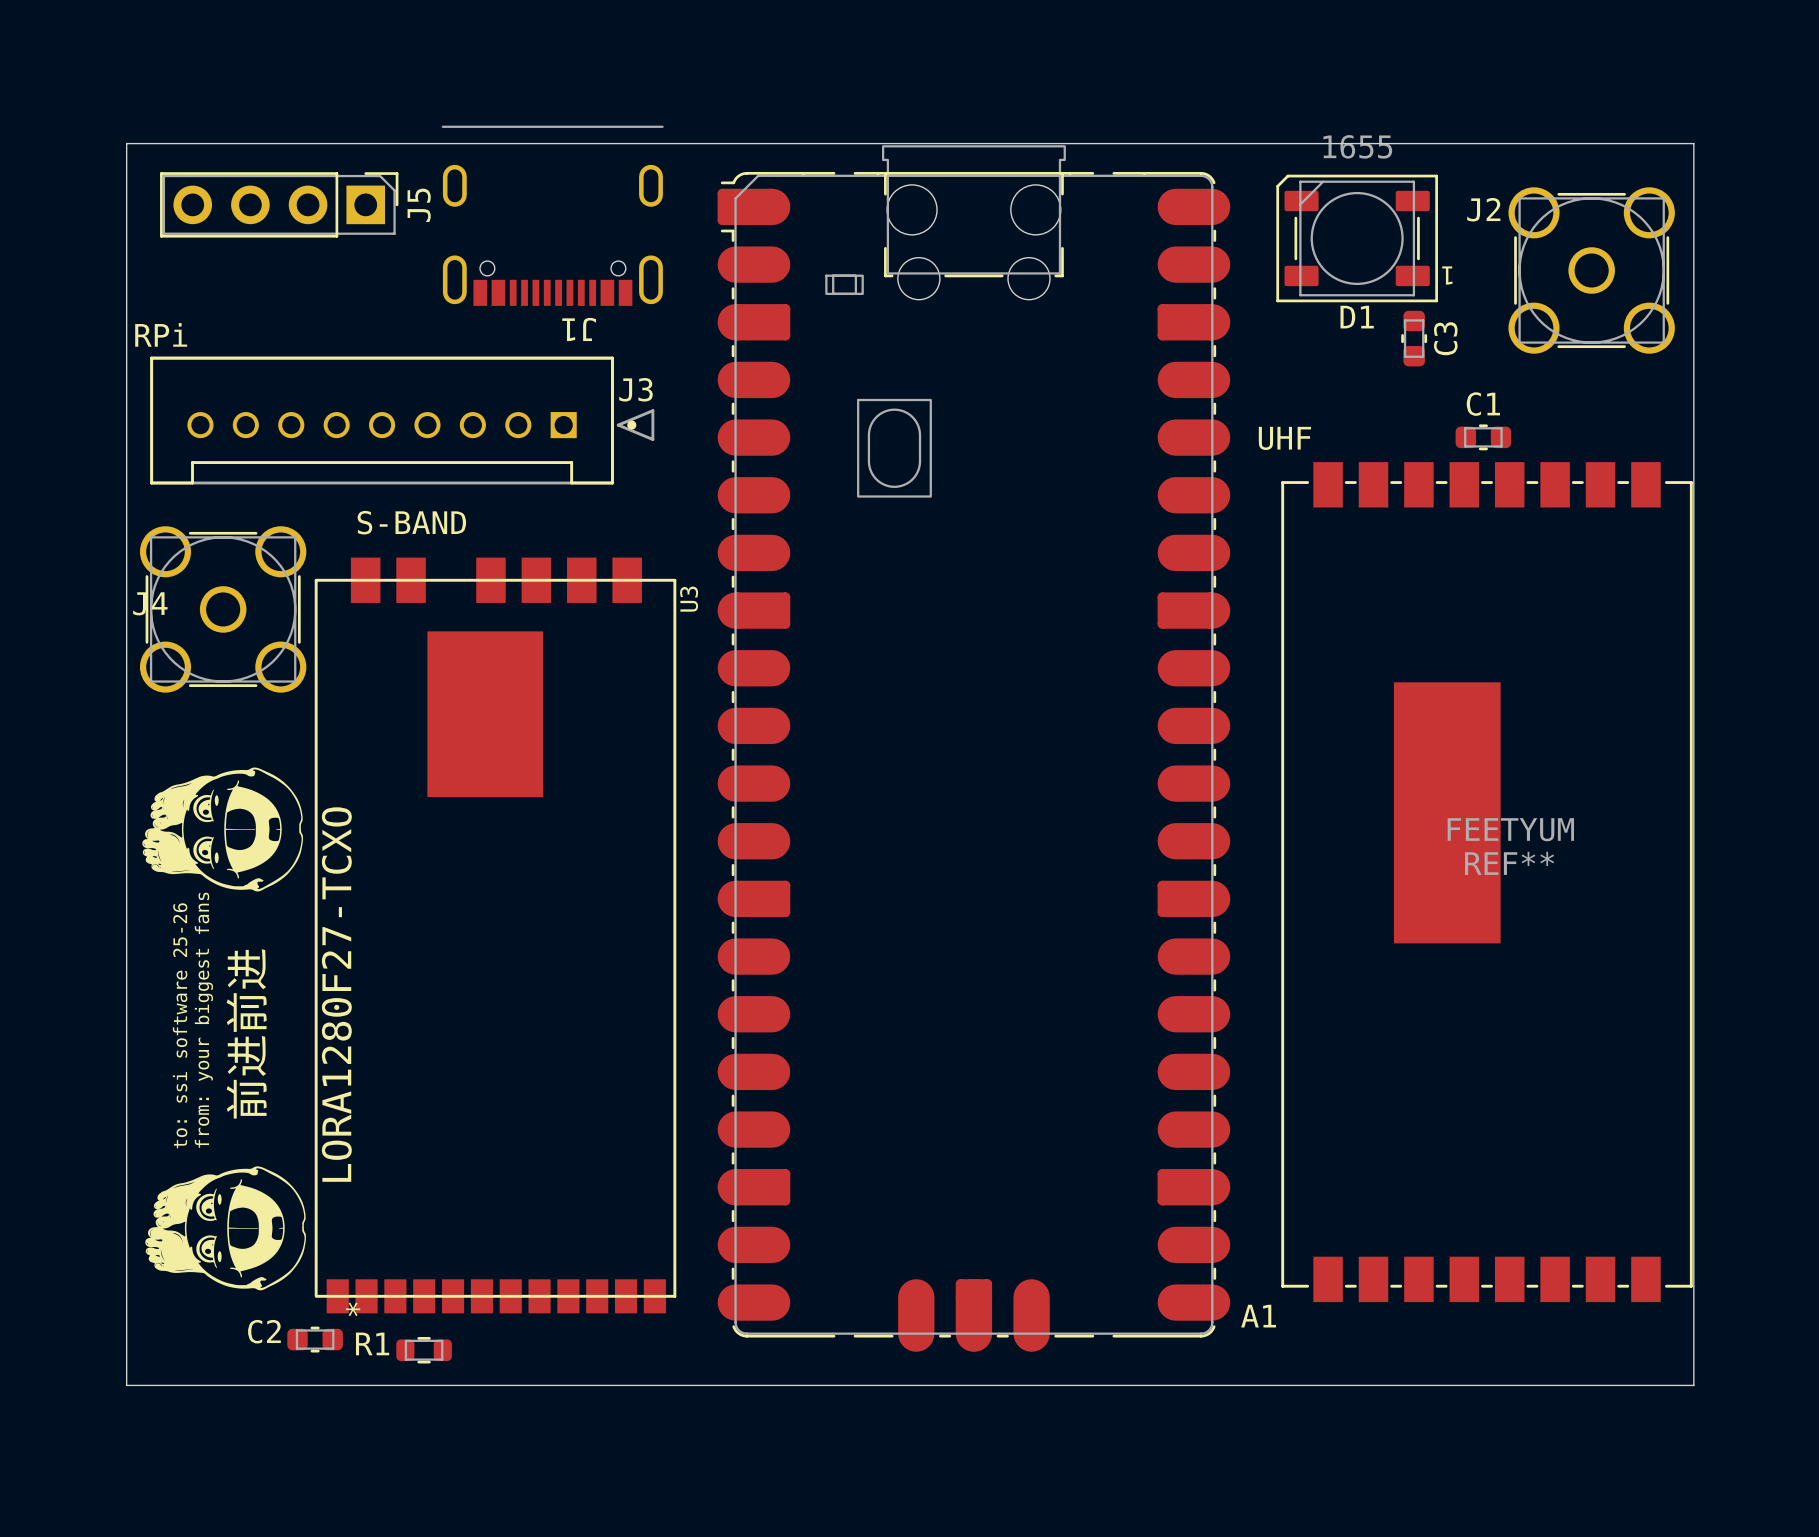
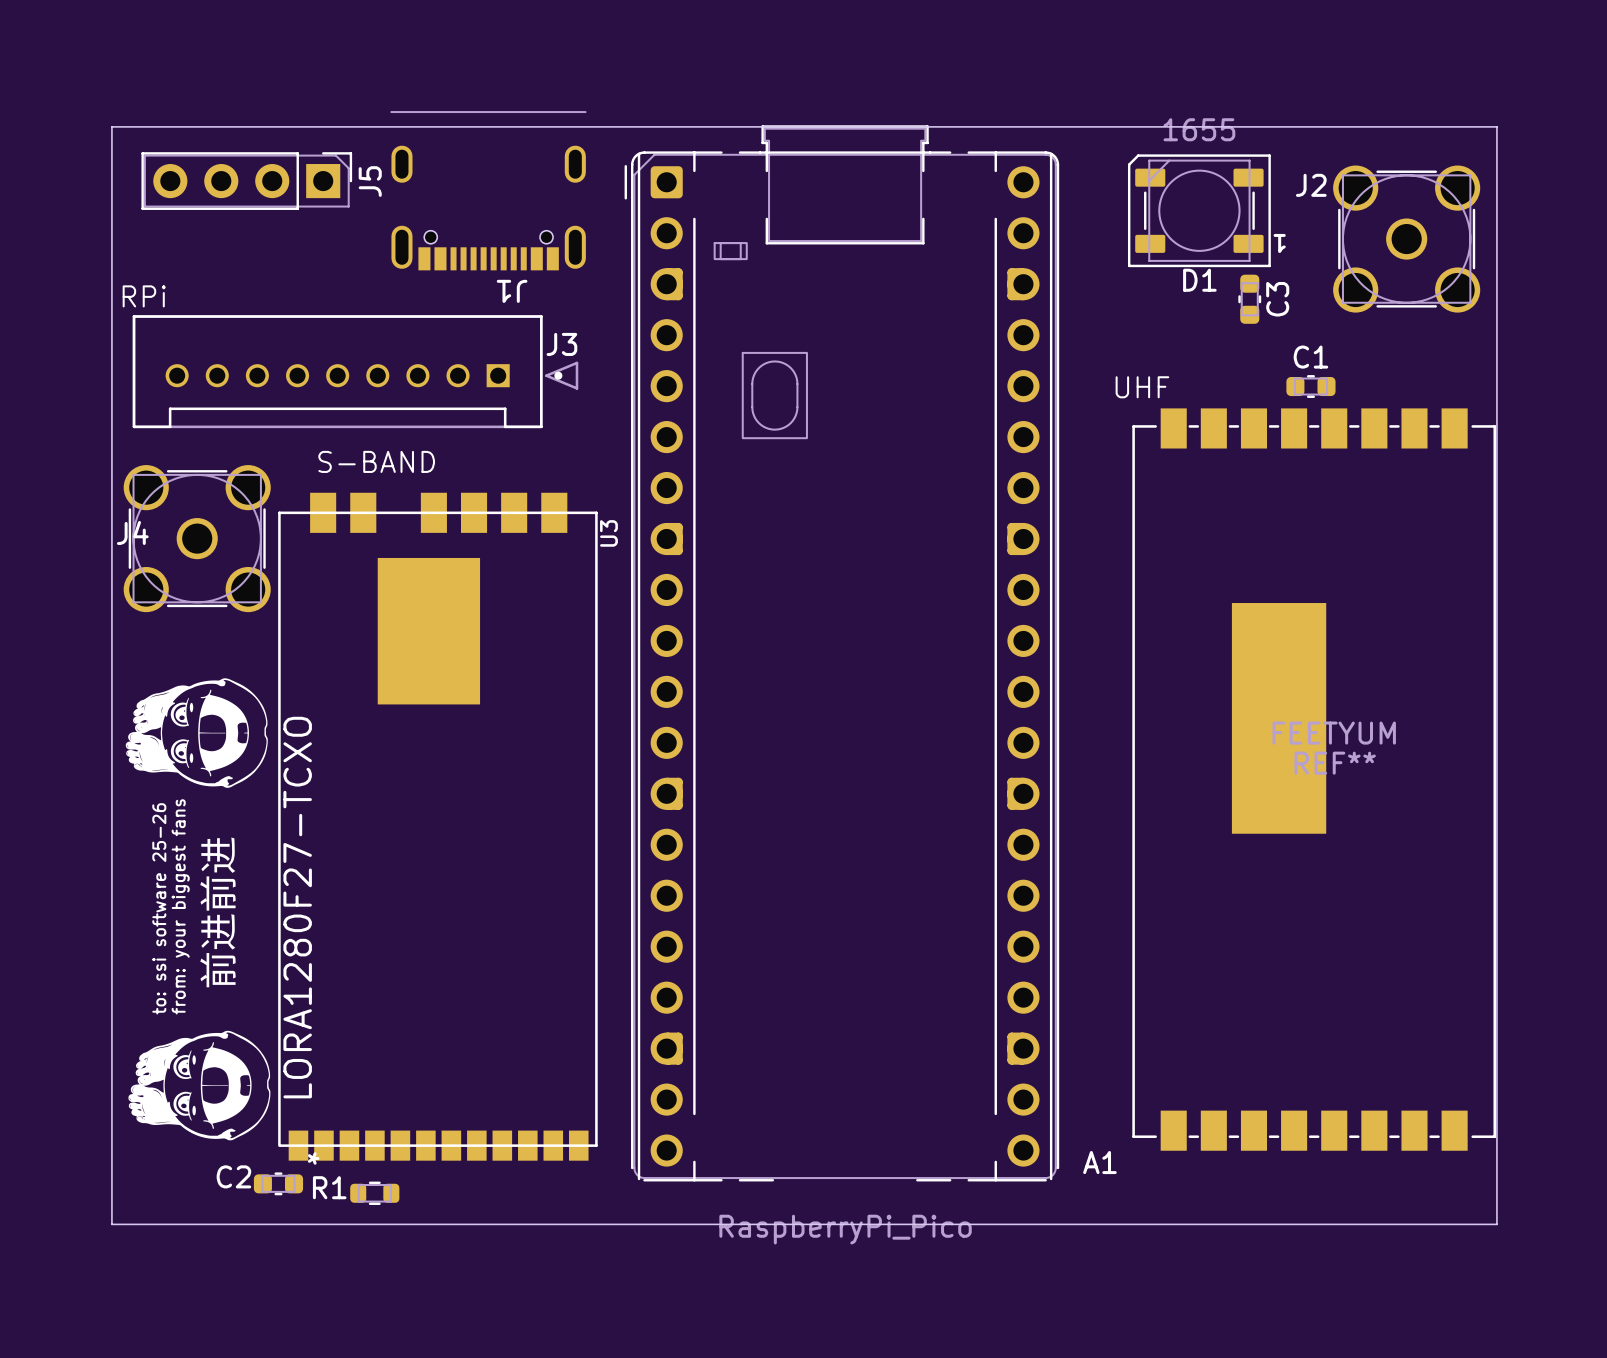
A1 footprint: [717, 145, 1231, 1352] -> [624, 125, 1060, 1182]
A1 value: none -> RaspberryPi_Pico (845, 1229)

